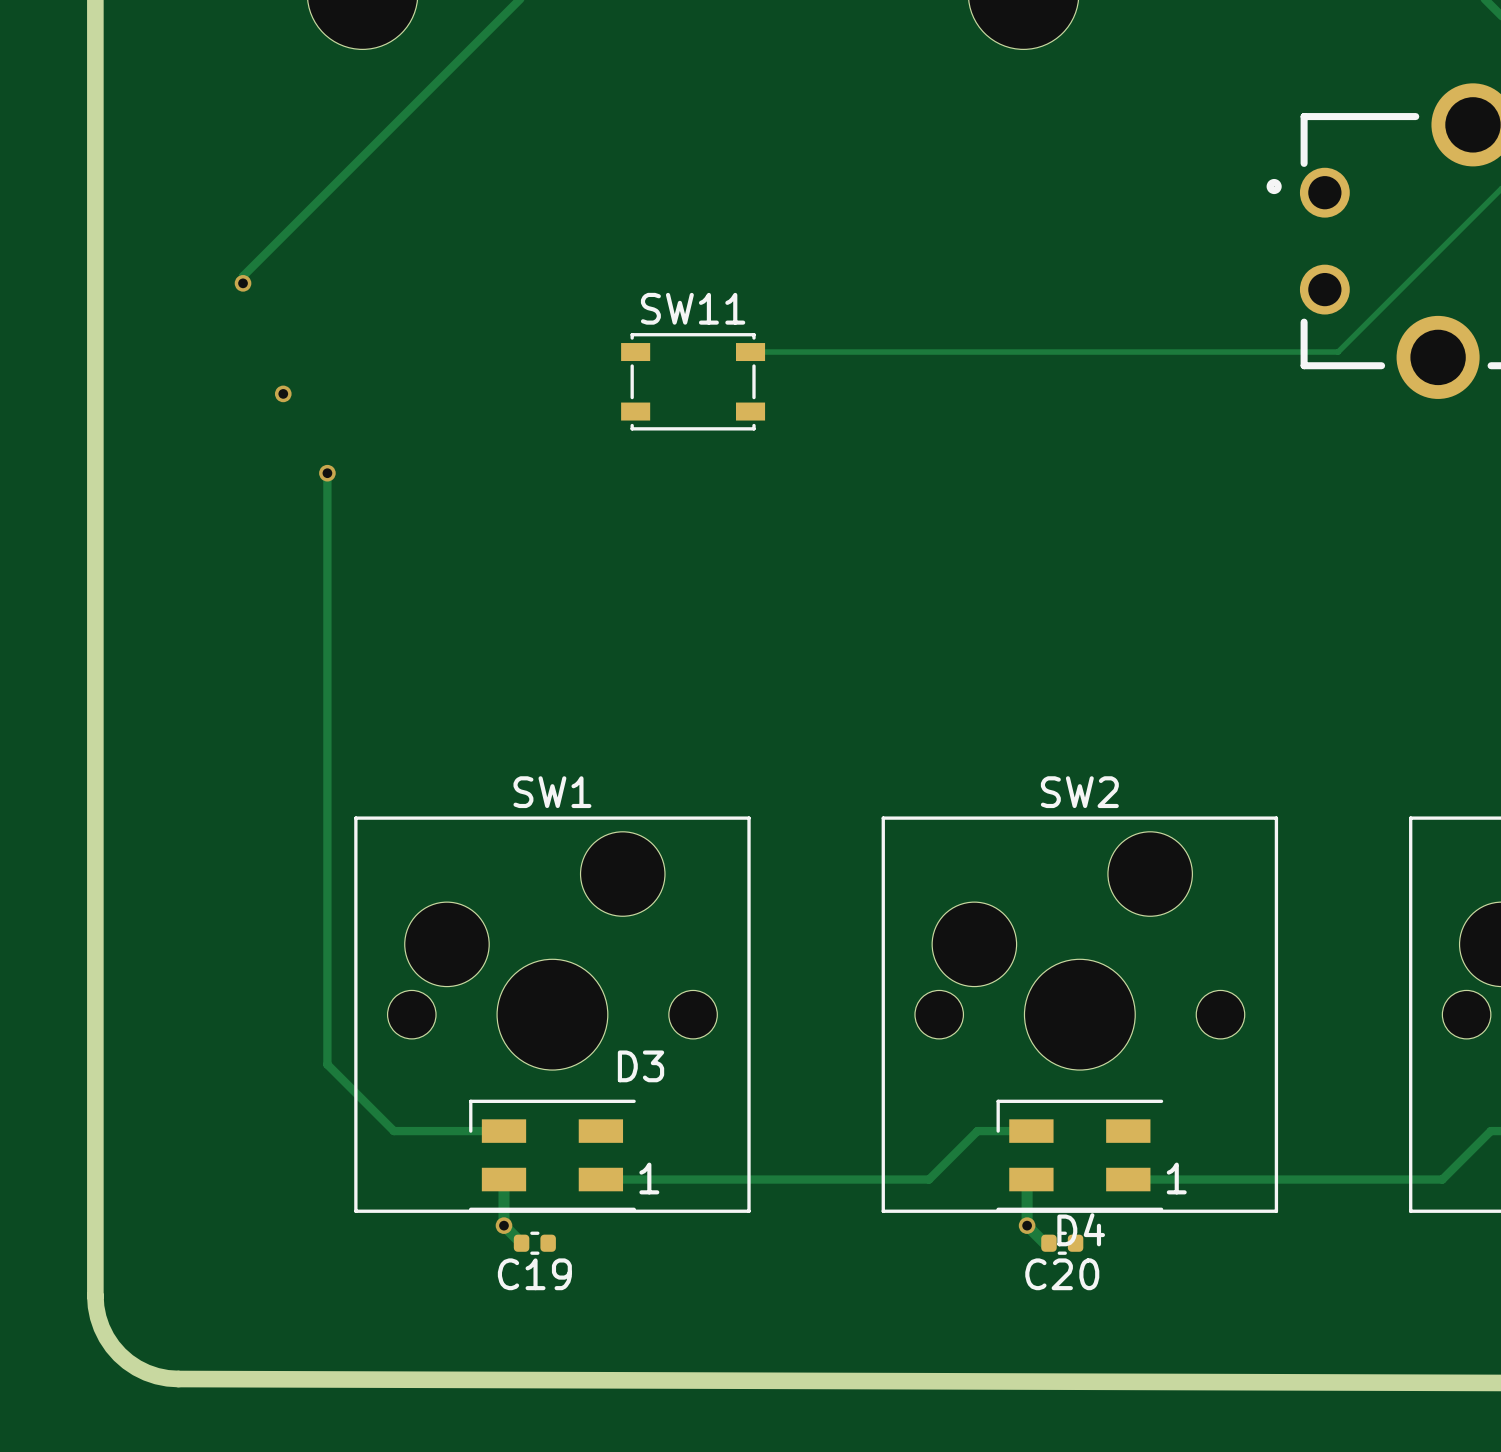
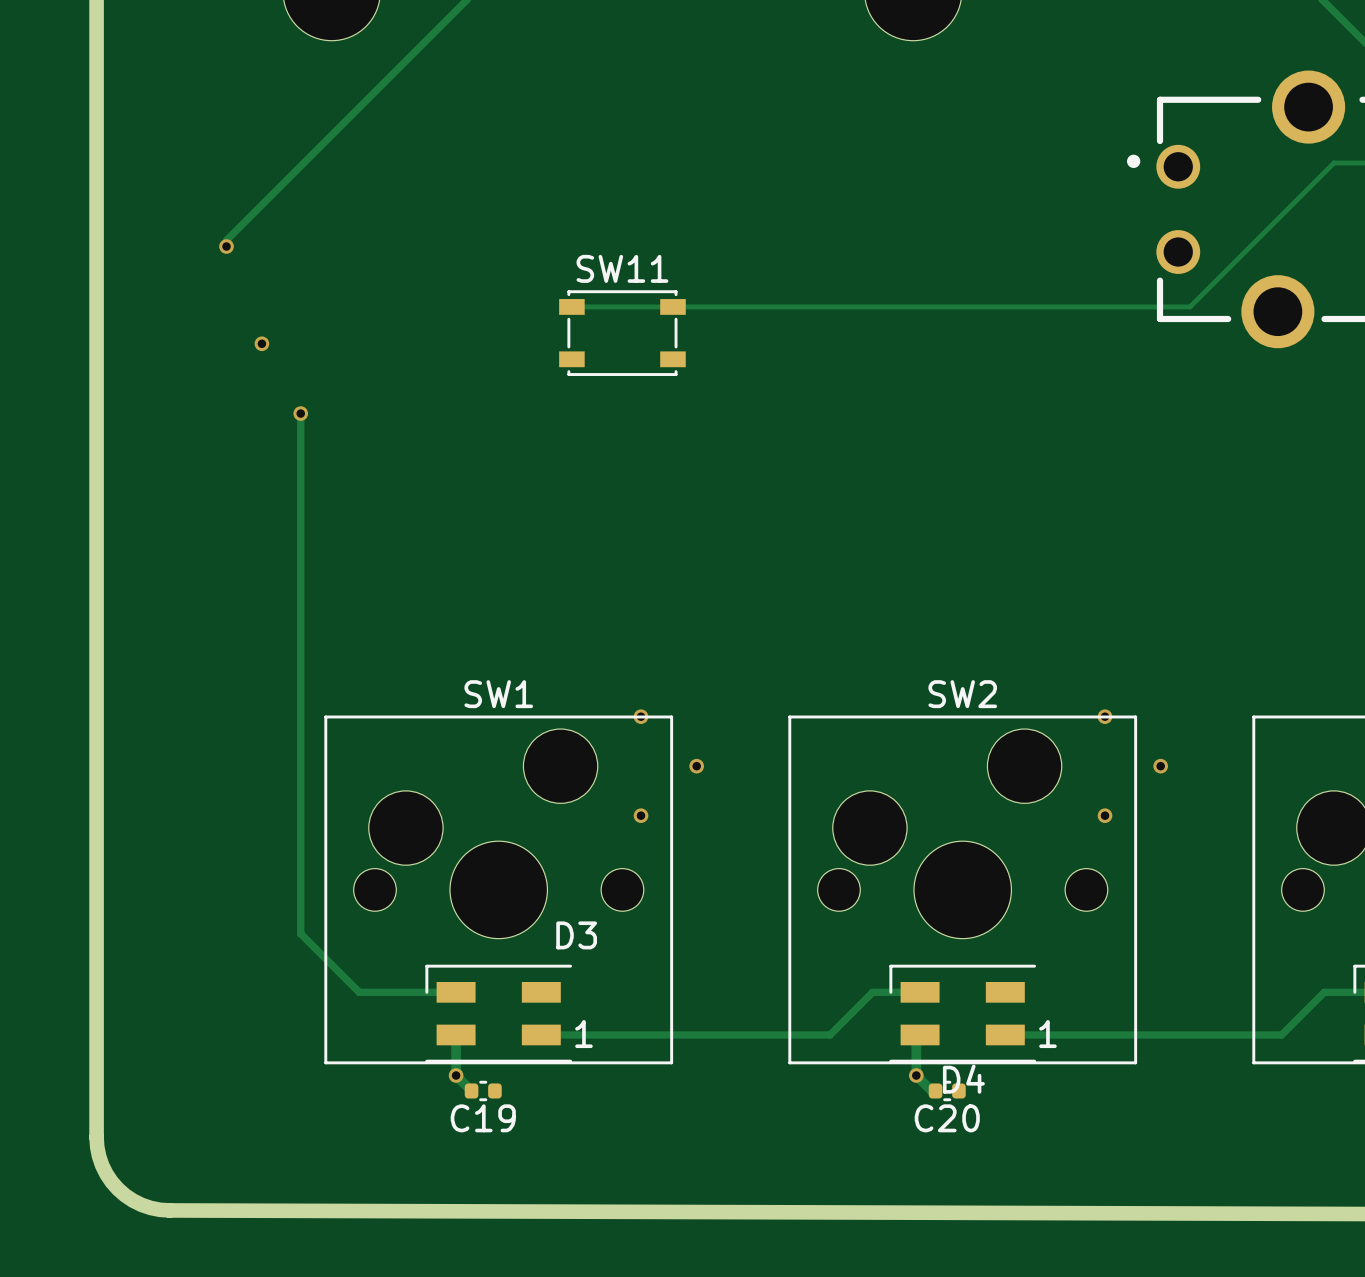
track: none -> (571, 306) (672, 306)
via: none -> (641, 716)
via: none -> (1105, 716)
via: none -> (696, 766)
via: none -> (1160, 766)
via: none -> (641, 815)
via: none -> (1105, 815)

